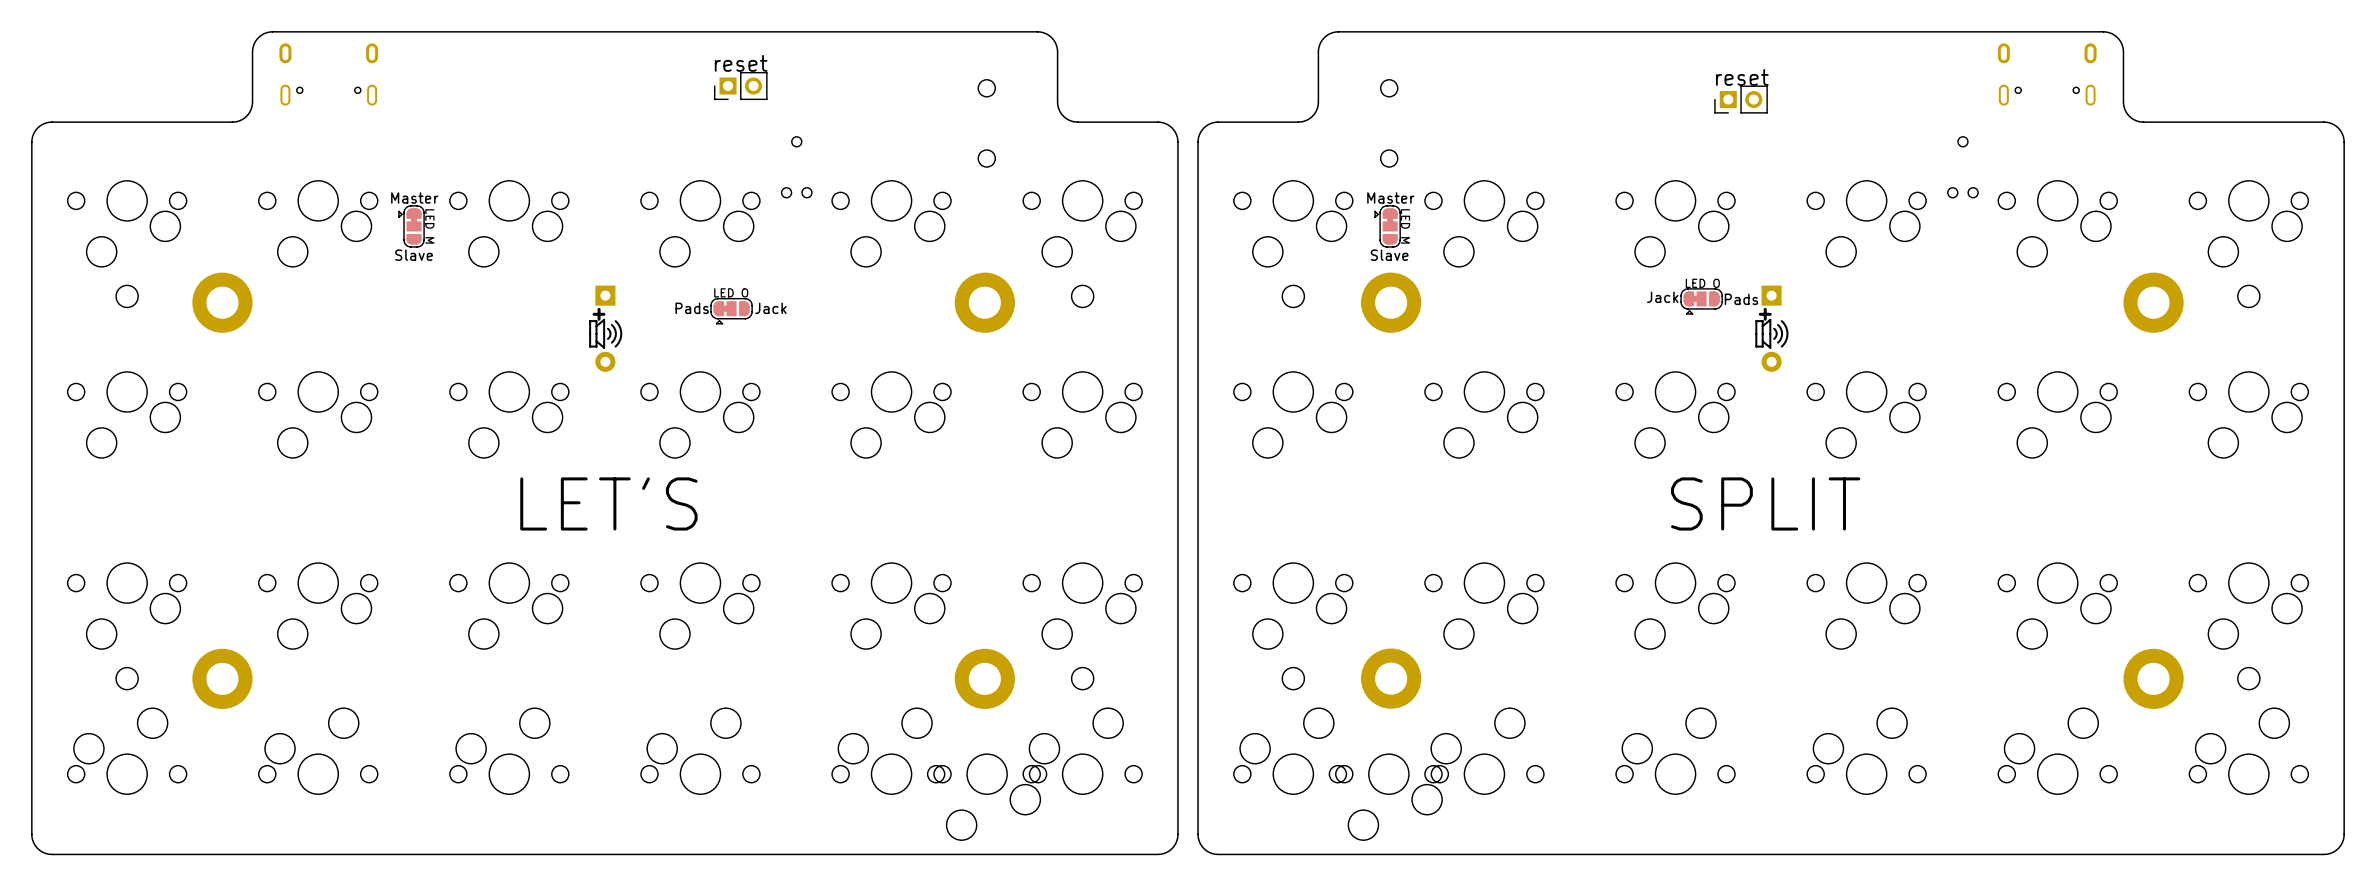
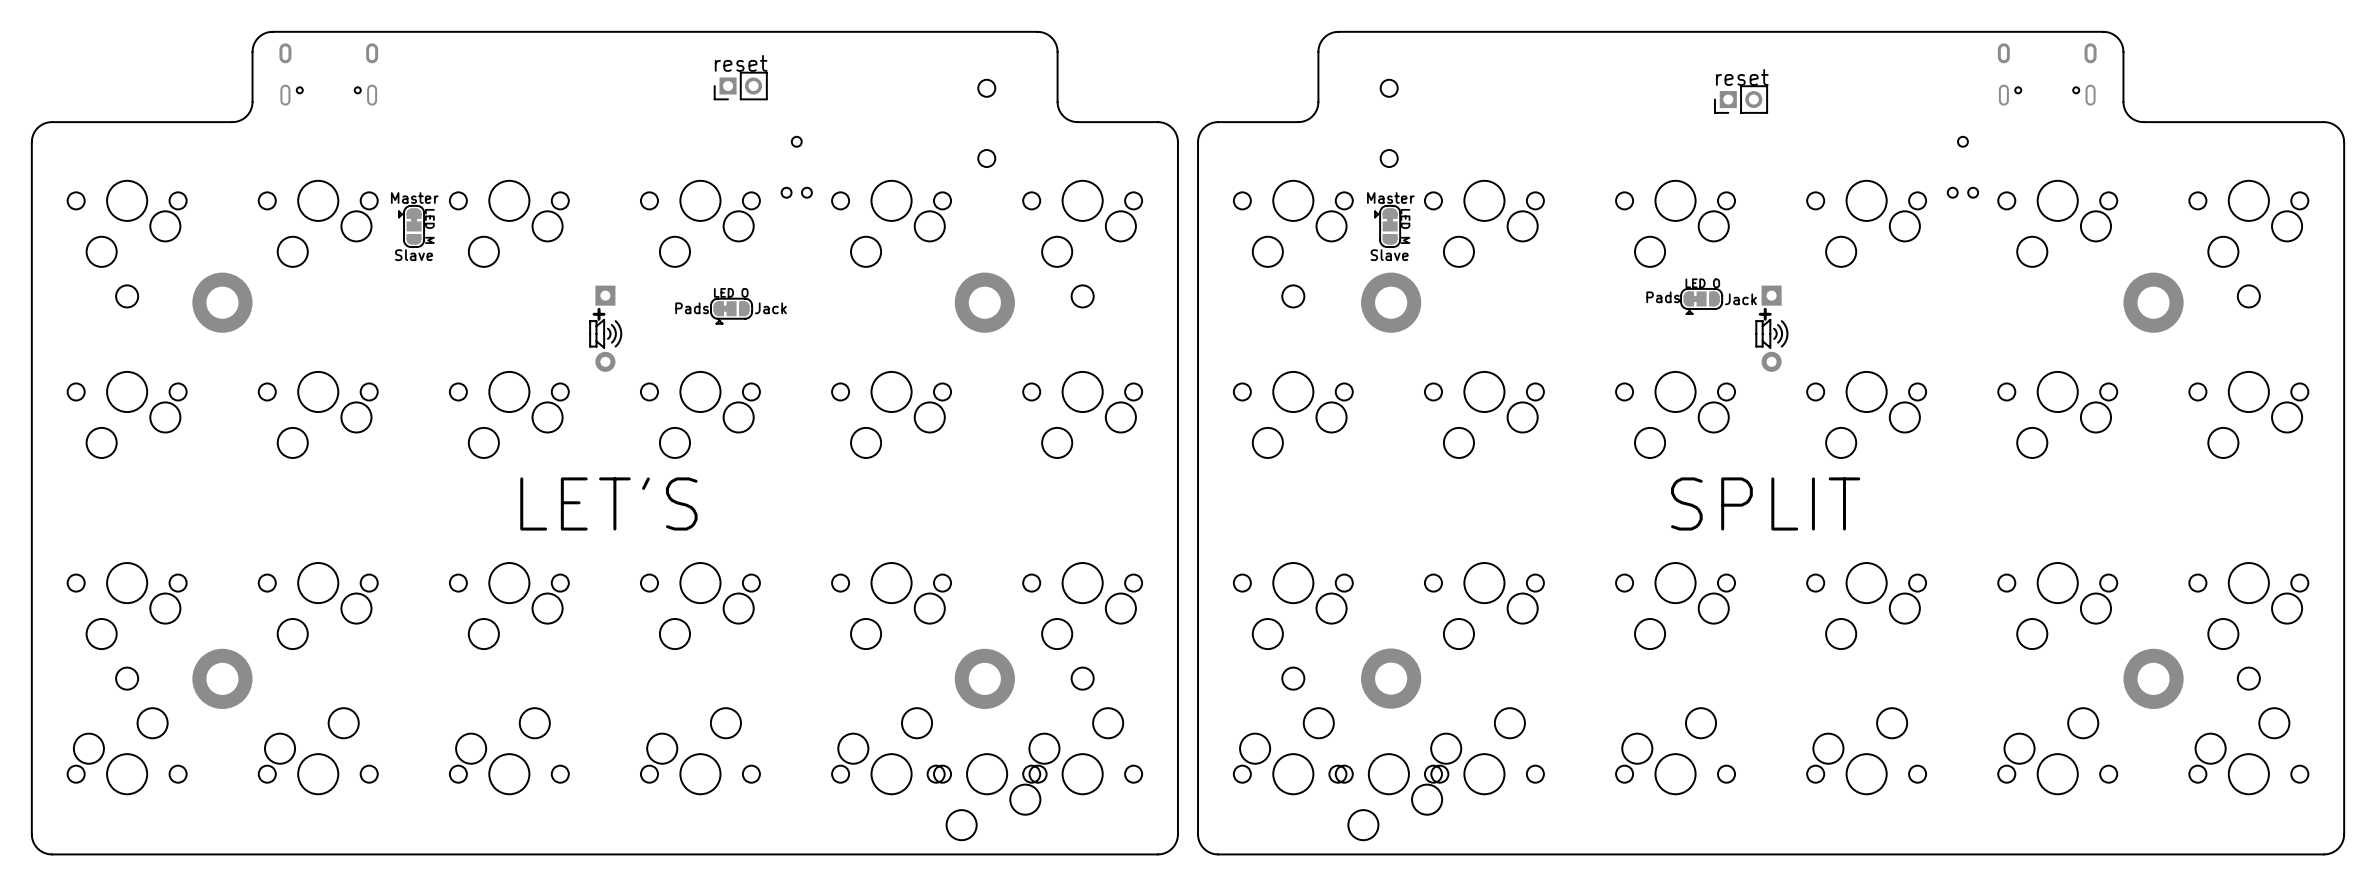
text: Jack (1662, 297) -> Pads (1663, 297)
text: Pads (1741, 299) -> Jack (1741, 299)

